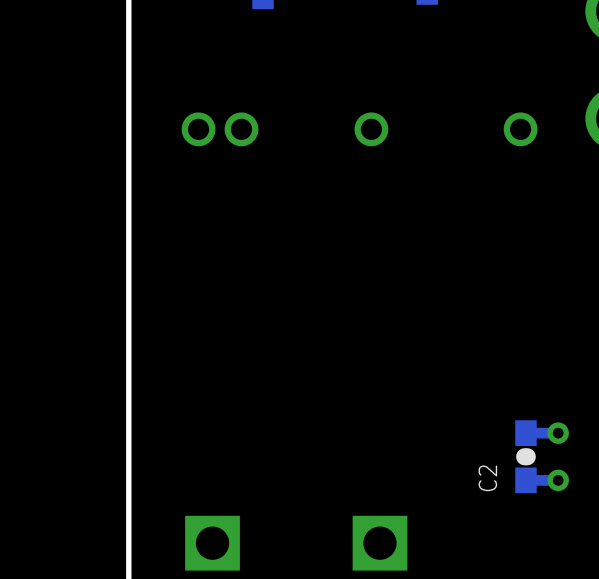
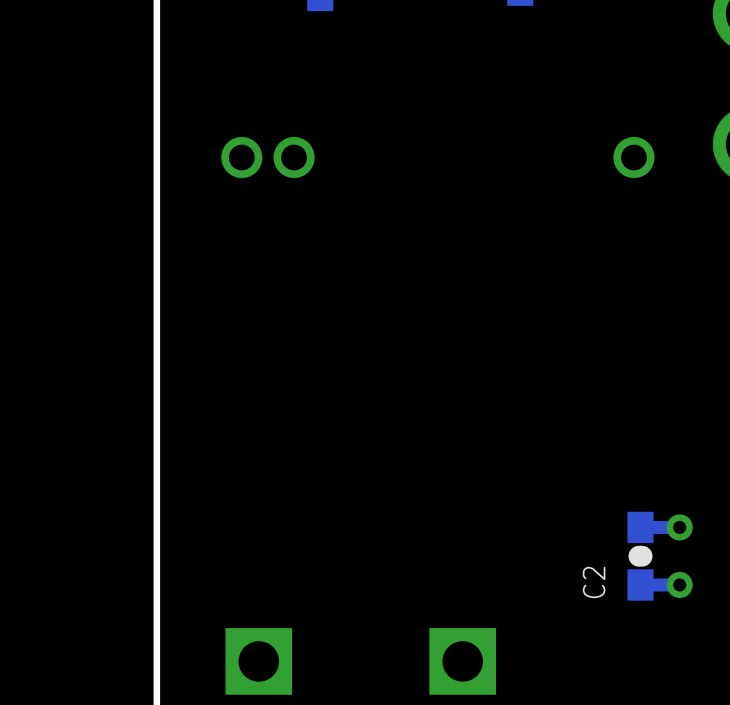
via: (371, 129) -> none

